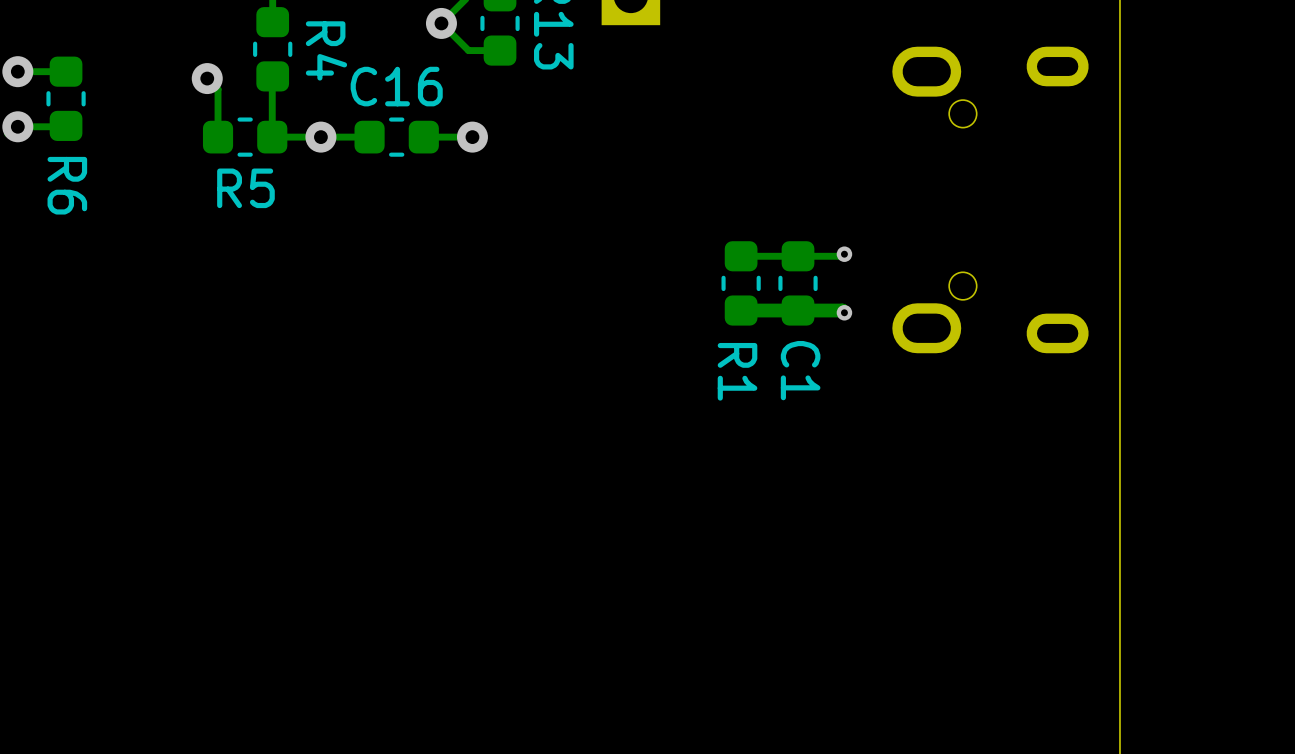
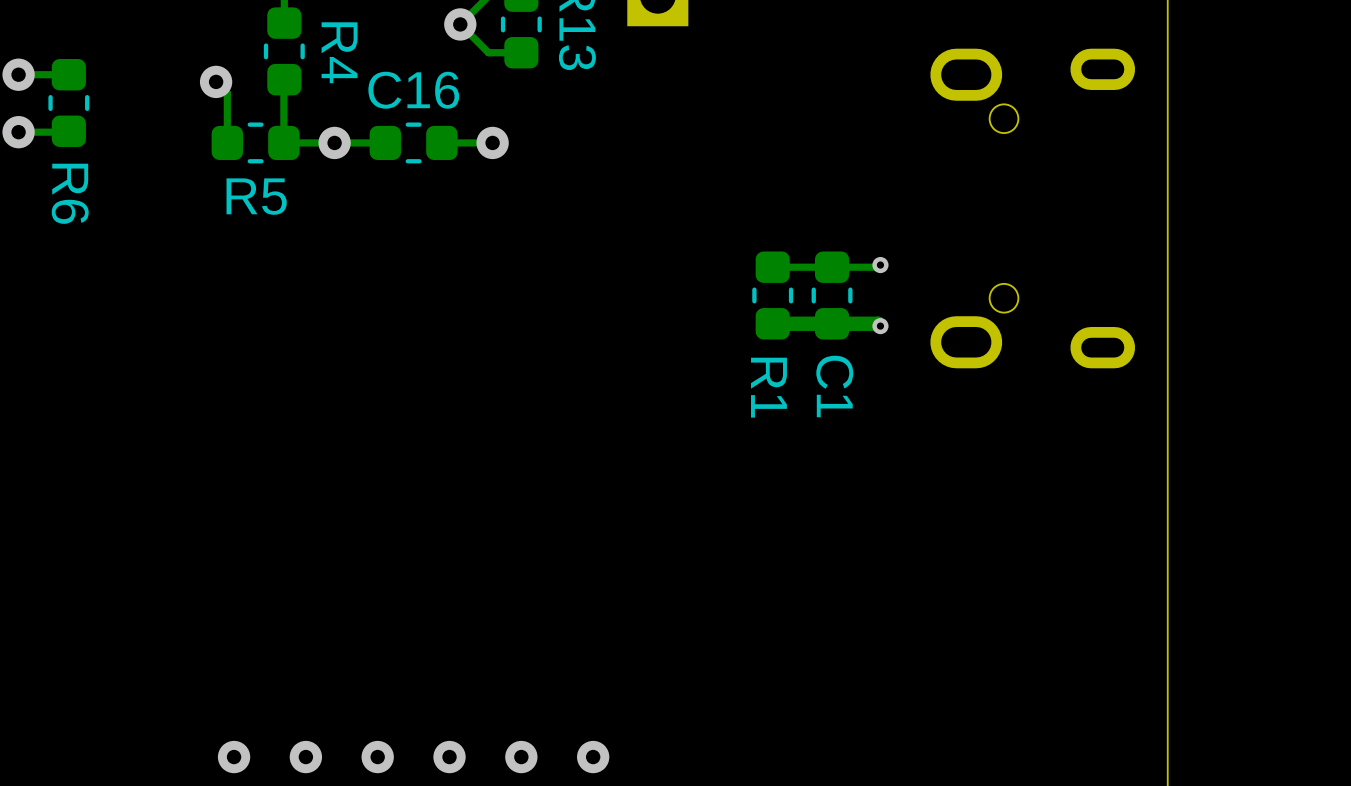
via: none -> (234, 757)
via: none -> (305, 757)
via: none -> (377, 757)
via: none -> (449, 757)
via: none -> (521, 757)
via: none -> (593, 757)

